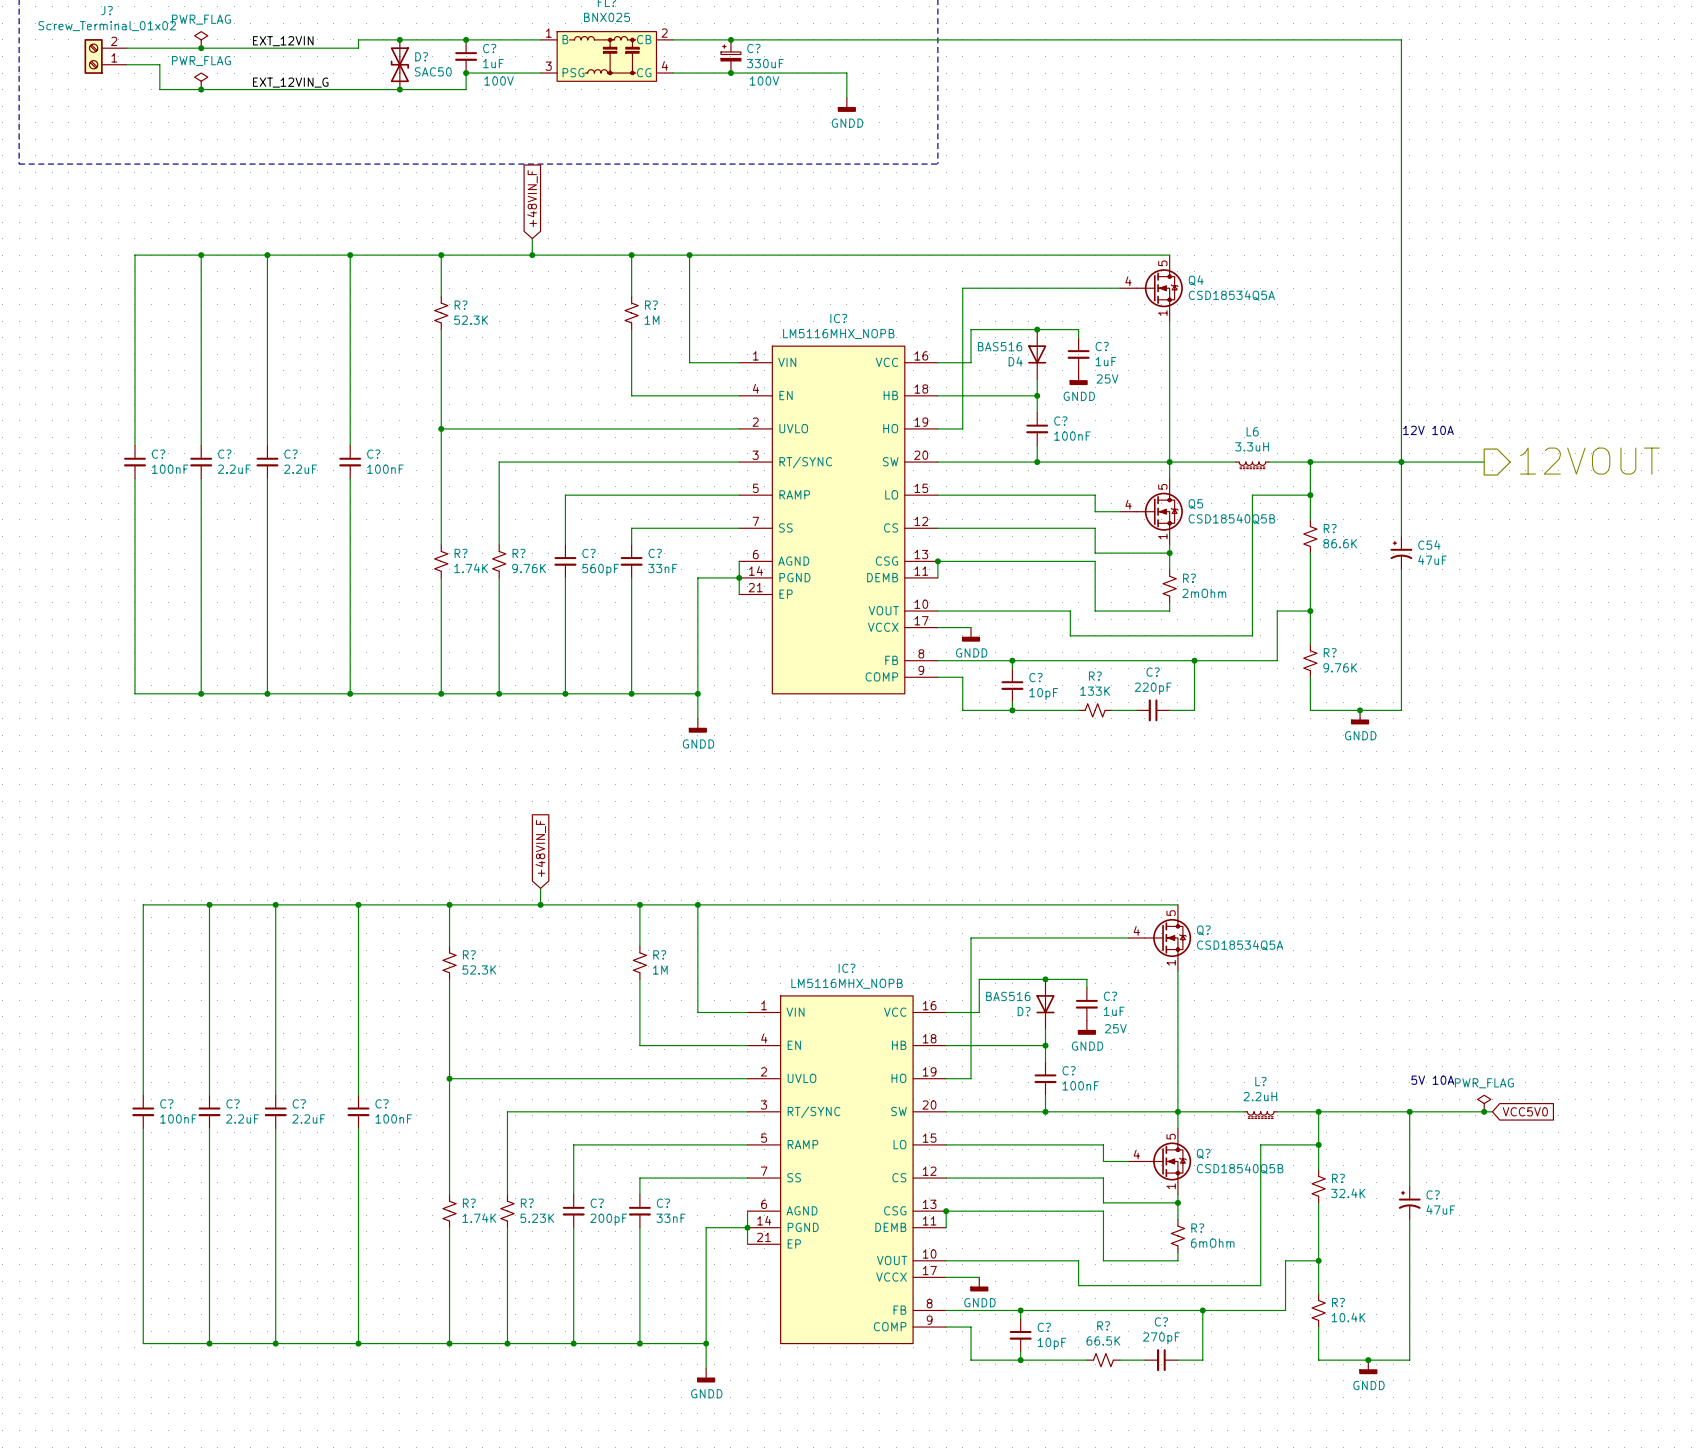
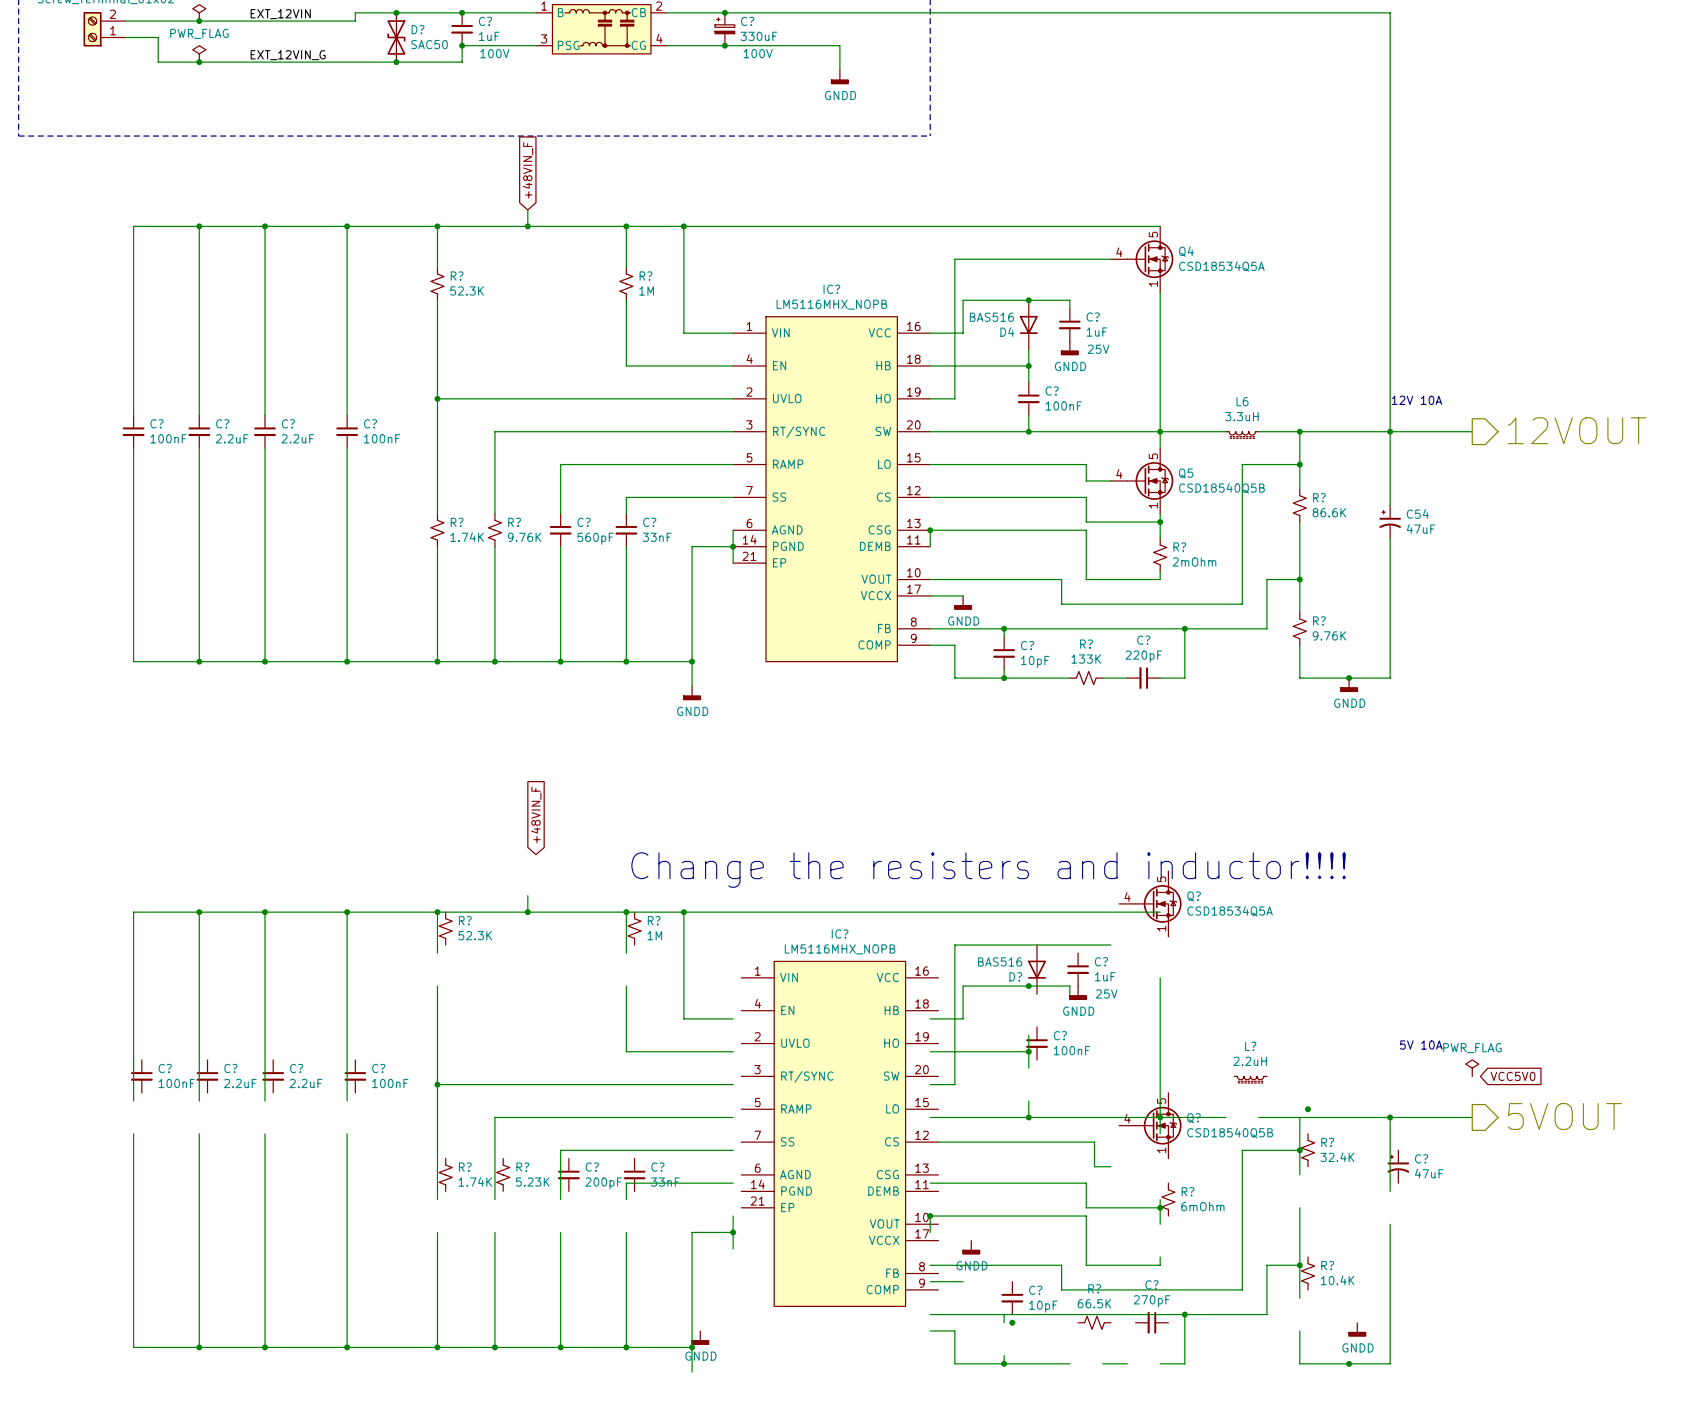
wire: (540, 888) (540, 904) -> (527, 895) (527, 912)
text: none -> Change the resisters and inductor!!!! (988, 870)
wire: (209, 904) (209, 1095) -> (199, 912) (199, 1101)
junction: (209, 904) -> none
wire: (275, 904) (275, 1095) -> (265, 912) (265, 1101)
junction: (275, 904) -> none
wire: (358, 904) (358, 1095) -> (347, 912) (347, 1101)
junction: (358, 904) -> none
wire: (449, 904) (449, 946) -> (437, 912) (437, 953)
junction: (449, 904) -> none
junction: (540, 904) -> none
wire: (639, 904) (639, 946) -> (626, 912) (626, 953)
junction: (639, 904) -> none
wire: (697, 904) (697, 1012) (747, 1012) -> (683, 912) (683, 1018) (733, 1018)
junction: (697, 904) -> none
wire: (1177, 904) (143, 904) (143, 1095) -> (1160, 912) (133, 912) (133, 1101)
wire: (1128, 937) (971, 937) (971, 1020) -> (1069, 994) (1069, 986) (963, 986)
junction: none -> (199, 912)
junction: none -> (265, 912)
junction: none -> (347, 912)
junction: none -> (437, 912)
junction: none -> (527, 912)
junction: none -> (626, 912)
junction: none -> (683, 912)
wire: (1177, 971) (1177, 1128) -> (1160, 977) (1160, 1133)
wire: (449, 979) (449, 1194) -> (437, 986) (437, 1199)
wire: (639, 979) (639, 1045) (747, 1045) -> (626, 986) (626, 1051) (733, 1051)
wire: (979, 979) (979, 1012) (946, 1012) -> (971, 945) (954, 945) (954, 1084) (930, 1084)
junction: (1045, 979) -> none
wire: (1086, 979) (1086, 987) -> (1078, 945) (1110, 945)
junction: none -> (1028, 986)
wire: (1045, 1029) (1045, 1062) -> (1028, 1035) (1028, 1068)
wire: (946, 1045) (1045, 1045) -> (930, 1051) (1028, 1051)
junction: (1045, 1045) -> none
wire: (971, 1053) (971, 1078) (946, 1078) -> (963, 1018) (930, 1018)
wire: (449, 1078) (747, 1078) -> (437, 1084) (733, 1084)
junction: (449, 1078) -> none
junction: none -> (1028, 1051)
wire: (1045, 1095) (1045, 1111) -> (1028, 1101) (1028, 1117)
wire: (747, 1111) (507, 1111) (507, 1194) -> (733, 1117) (494, 1117) (494, 1199)
wire: (946, 1111) (1244, 1111) -> (930, 1117) (1225, 1117)
junction: (1045, 1111) -> none
junction: (1177, 1111) -> none
wire: (1277, 1111) (1492, 1111) -> (1258, 1117) (1472, 1117)
wire: (1318, 1111) (1318, 1169) -> (1299, 1117) (1299, 1174)
junction: (1318, 1111) -> none
wire: (1409, 1111) (1409, 1186) -> (1390, 1117) (1390, 1191)
junction: (1409, 1111) -> none
junction: (1484, 1111) -> none
junction: none -> (437, 1084)
wire: (143, 1128) (143, 1343) (706, 1343) -> (133, 1133) (133, 1347) (692, 1347)
wire: (209, 1128) (209, 1343) -> (199, 1133) (199, 1347)
wire: (275, 1128) (275, 1343) -> (265, 1133) (265, 1347)
wire: (358, 1128) (358, 1343) -> (347, 1133) (347, 1347)
wire: (747, 1144) (573, 1144) (573, 1194) -> (733, 1150) (560, 1150) (560, 1199)
wire: (946, 1144) (1103, 1144) (1103, 1161) (1128, 1161) -> none
wire: (1318, 1144) (1260, 1144) (1260, 1285) (1078, 1285) (1078, 1260) (946, 1260) -> (1299, 1150) (1242, 1150) (1242, 1289) (1061, 1289) (1061, 1265) (930, 1265)
hierarchical label: none -> 5VOUT (1564, 1116)
junction: none -> (1028, 1117)
junction: none -> (1160, 1117)
junction: none -> (1390, 1117)
wire: (747, 1178) (639, 1178) (639, 1194) -> (733, 1183) (626, 1183) (626, 1199)
junction: none -> (1299, 1150)
wire: (1177, 1194) (1177, 1219) -> (1160, 1199) (1160, 1224)
wire: (1120, 1202) (1177, 1202) -> none
junction: (1177, 1202) -> none
wire: (1318, 1202) (1318, 1293) -> (1299, 1207) (1299, 1298)
wire: (747, 1211) (747, 1244) -> (733, 1216) (733, 1248)
junction: (946, 1211) -> none
wire: none -> (930, 1183) (1086, 1183) (1086, 1207) (1160, 1207)
wire: (1409, 1219) (1409, 1360) (1318, 1360) (1318, 1327) -> (1390, 1224) (1390, 1363) (1299, 1363) (1299, 1330)
wire: (449, 1227) (449, 1343) -> (437, 1232) (437, 1347)
wire: (507, 1227) (507, 1343) -> (494, 1232) (494, 1347)
wire: (573, 1227) (573, 1343) -> (560, 1232) (560, 1347)
wire: (639, 1227) (639, 1343) -> (626, 1232) (626, 1347)
wire: (747, 1227) (706, 1227) (706, 1368) -> (733, 1232) (692, 1232) (692, 1372)
junction: (747, 1227) -> none
wire: (946, 1227) (946, 1211) (1103, 1211) (1103, 1260) (1177, 1260) (1177, 1252) -> (930, 1232) (930, 1216) (1086, 1216) (1086, 1265) (1160, 1265) (1160, 1257)
junction: none -> (1160, 1207)
junction: none -> (930, 1216)
wire: (1318, 1260) (1285, 1260) (1285, 1310) (946, 1310) -> (1299, 1265) (1266, 1265) (1266, 1314) (930, 1314)
junction: (1318, 1260) -> none
junction: none -> (733, 1232)
wire: (946, 1277) (979, 1277) -> (930, 1281) (963, 1281)
junction: none -> (1299, 1265)
wire: (1020, 1310) (1020, 1318) -> (1004, 1314) (1004, 1322)
junction: (1020, 1310) -> none
wire: (1202, 1310) (1202, 1360) (1177, 1360) -> (1184, 1314) (1184, 1363) (1160, 1363)
junction: (1202, 1310) -> none
wire: (946, 1327) (971, 1327) (971, 1360) (1086, 1360) -> (930, 1330) (954, 1330) (954, 1363) (1069, 1363)
junction: (209, 1343) -> none
junction: (275, 1343) -> none
junction: (358, 1343) -> none
junction: (449, 1343) -> none
junction: (507, 1343) -> none
junction: (573, 1343) -> none
junction: (639, 1343) -> none
junction: (706, 1343) -> none
wire: (1020, 1351) (1020, 1360) -> (1004, 1355) (1004, 1363)
junction: none -> (1184, 1314)
wire: (1120, 1360) (1144, 1360) -> (1102, 1363) (1127, 1363)
junction: (1368, 1360) -> none
junction: none -> (199, 1347)
junction: none -> (265, 1347)
junction: none -> (347, 1347)
junction: none -> (437, 1347)
junction: none -> (494, 1347)
junction: none -> (560, 1347)
junction: none -> (626, 1347)
junction: none -> (692, 1347)
junction: none -> (1004, 1363)
junction: none -> (1349, 1363)

